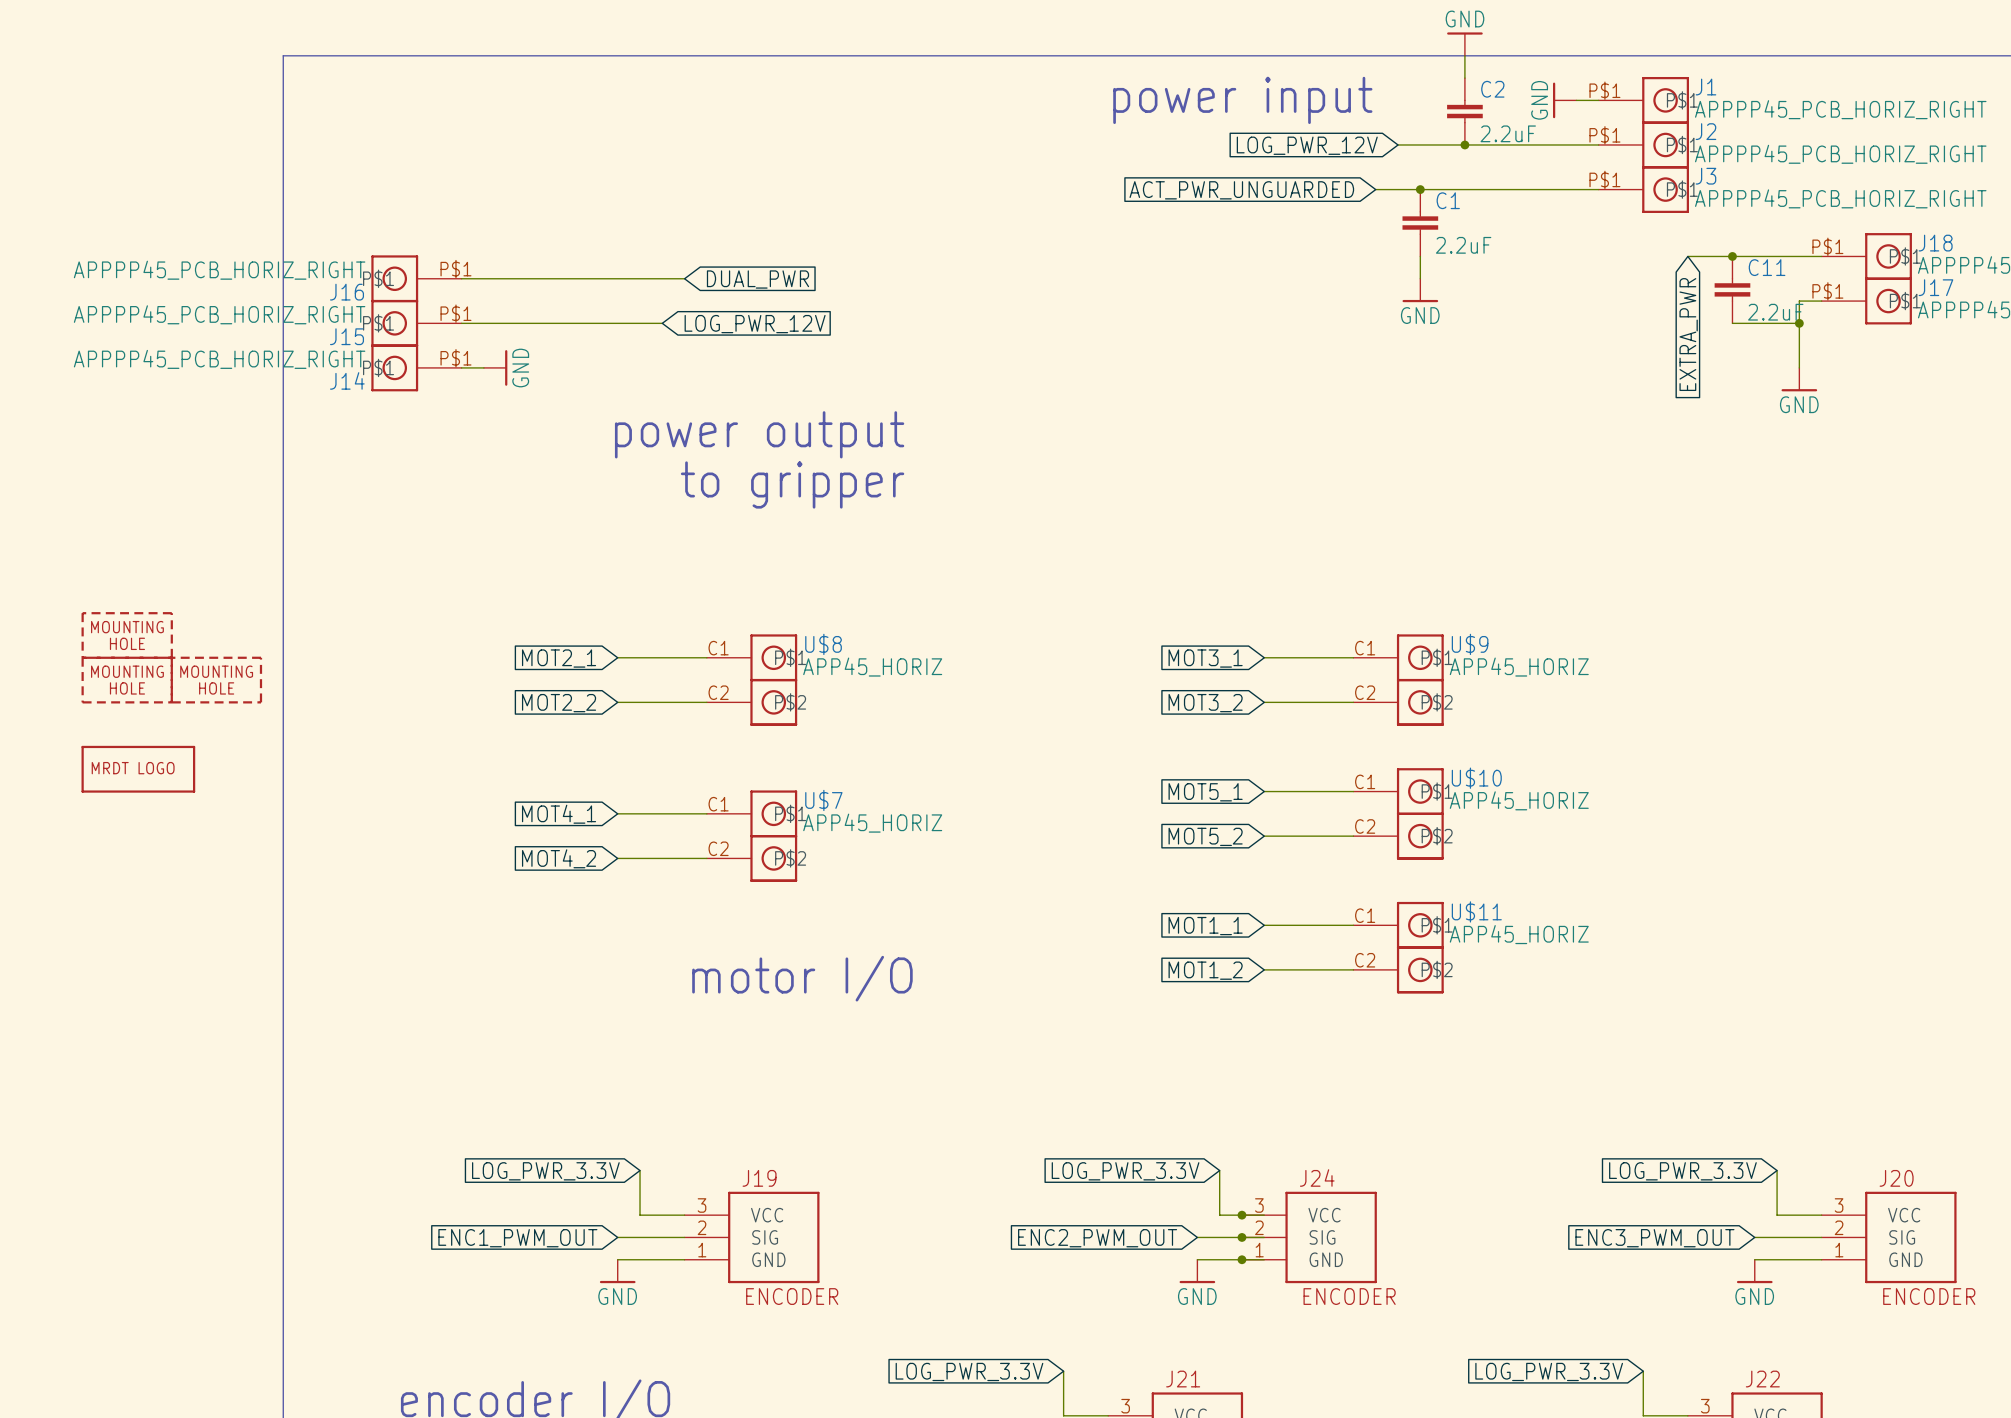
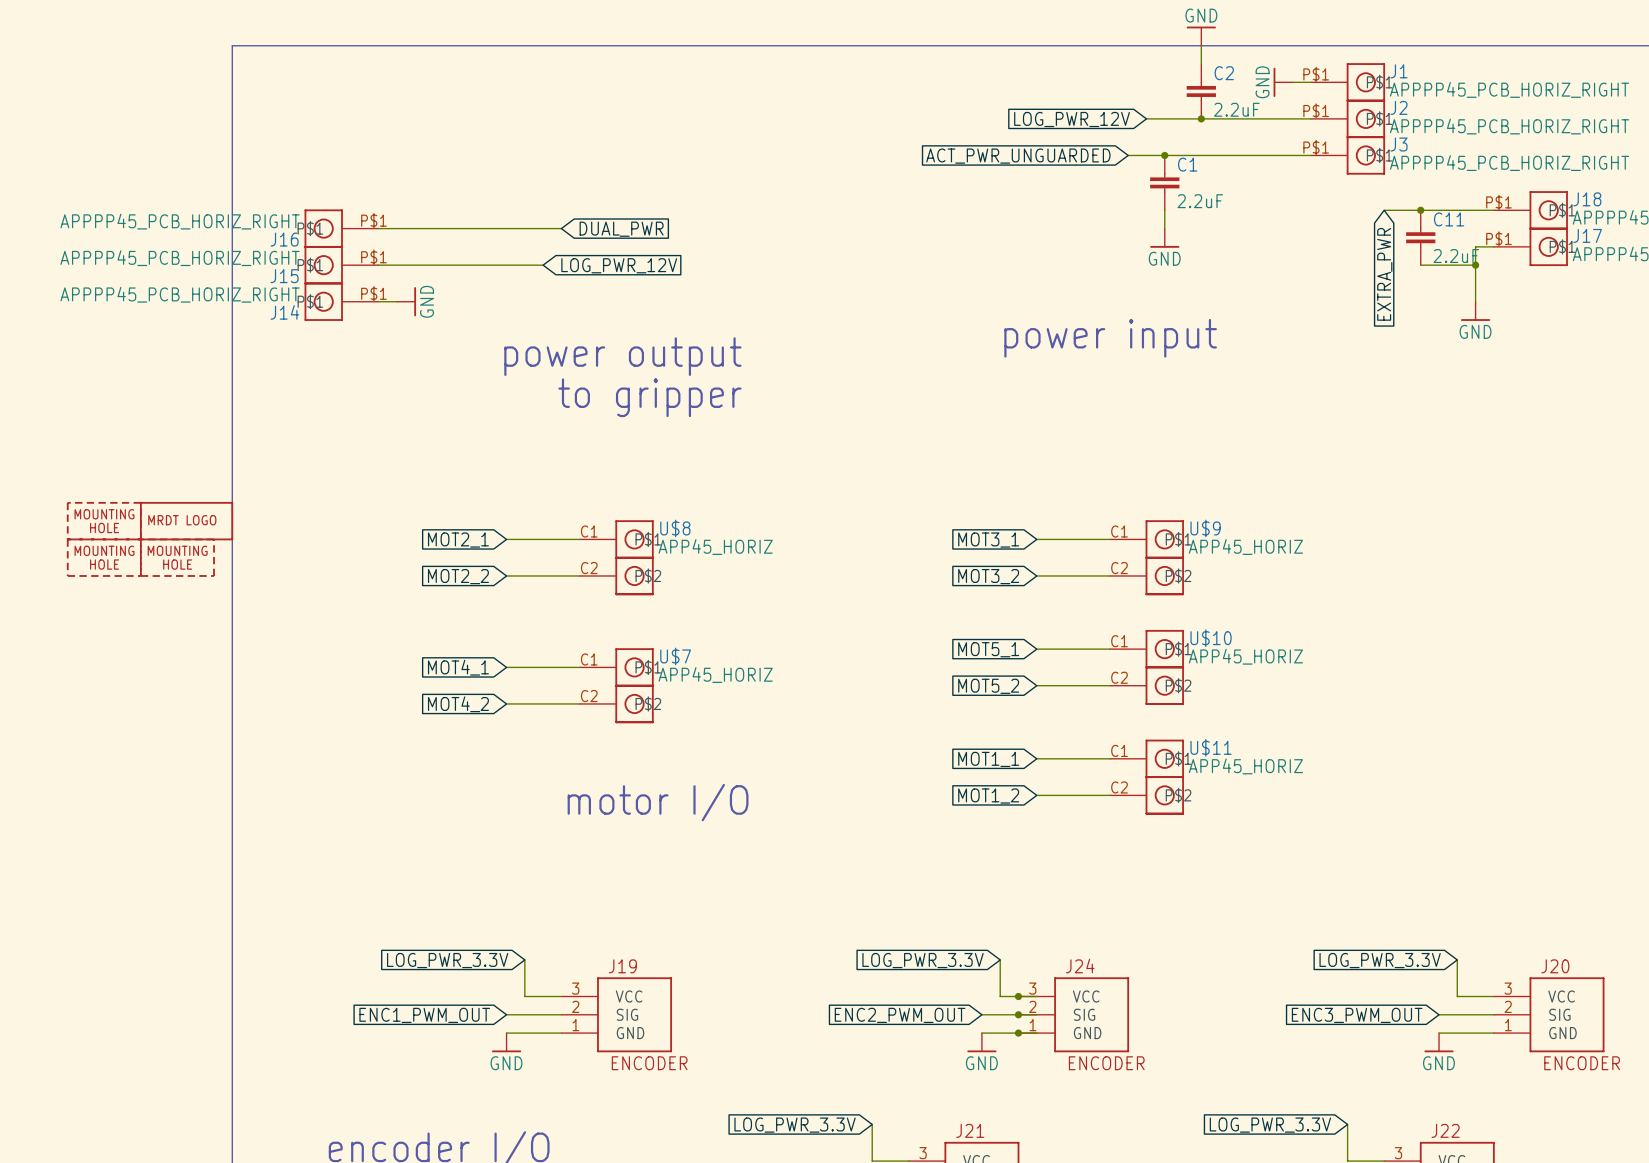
text: power input (1242, 100) -> none
text: none -> power input (1110, 338)
part position: (138, 769) -> (186, 521)

